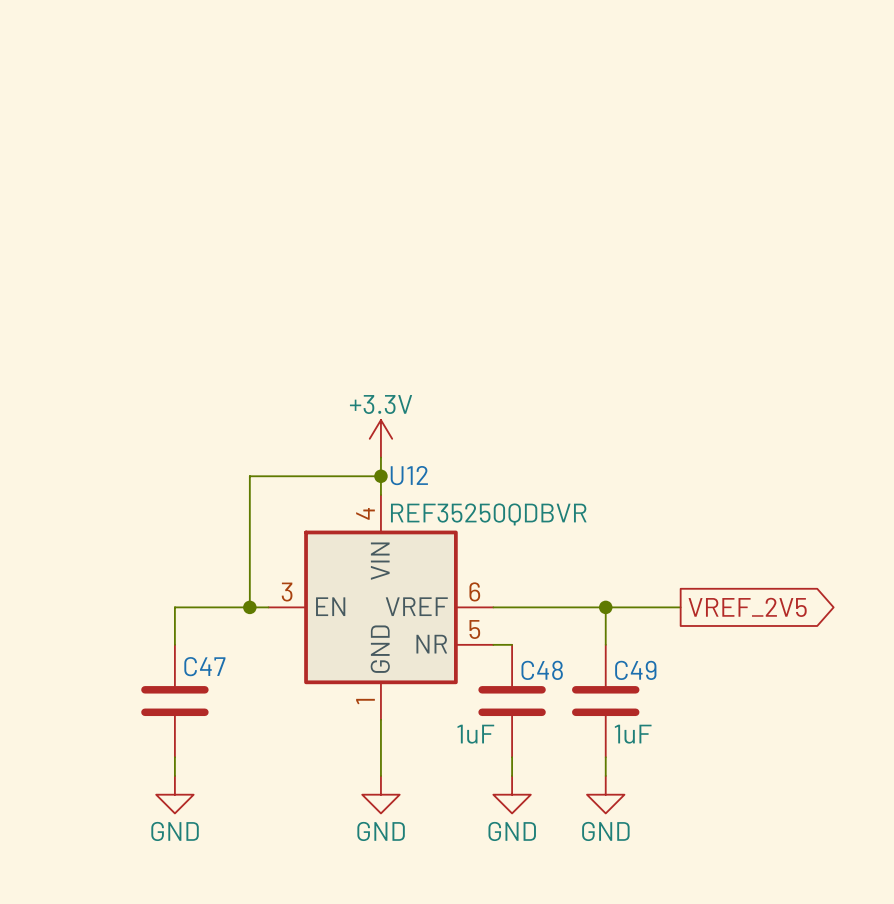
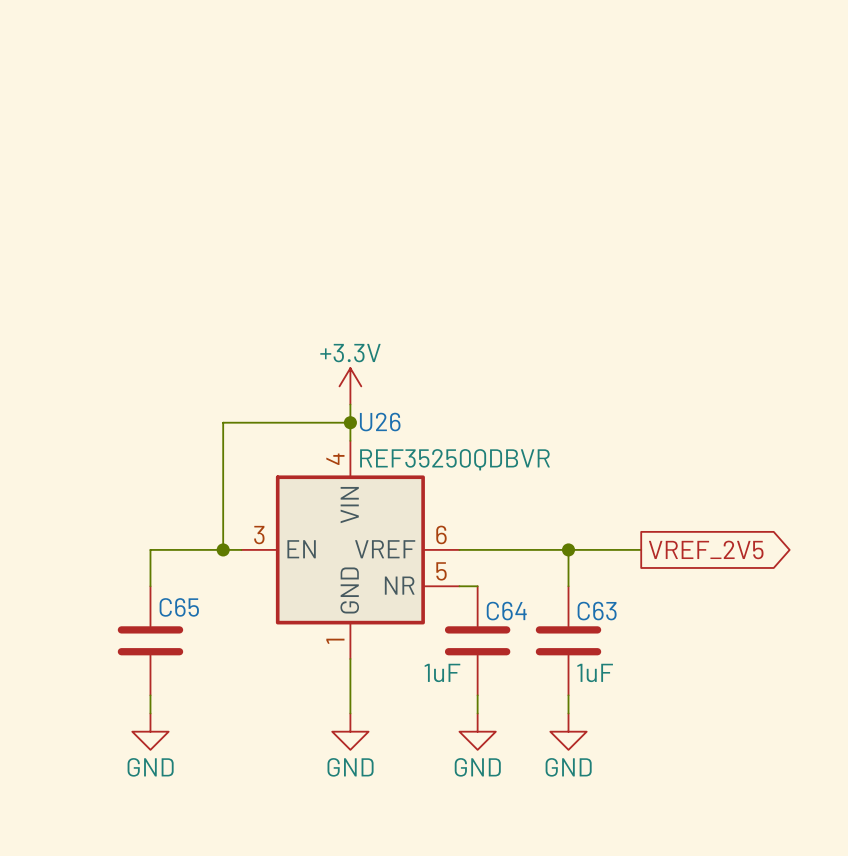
U12 name: U12 (409, 475) -> U26 (380, 422)
C47 name: C47 (204, 666) -> C65 (179, 607)
C48 name: C48 (542, 670) -> C64 (506, 611)
C49 name: C49 (635, 670) -> C63 (597, 611)

